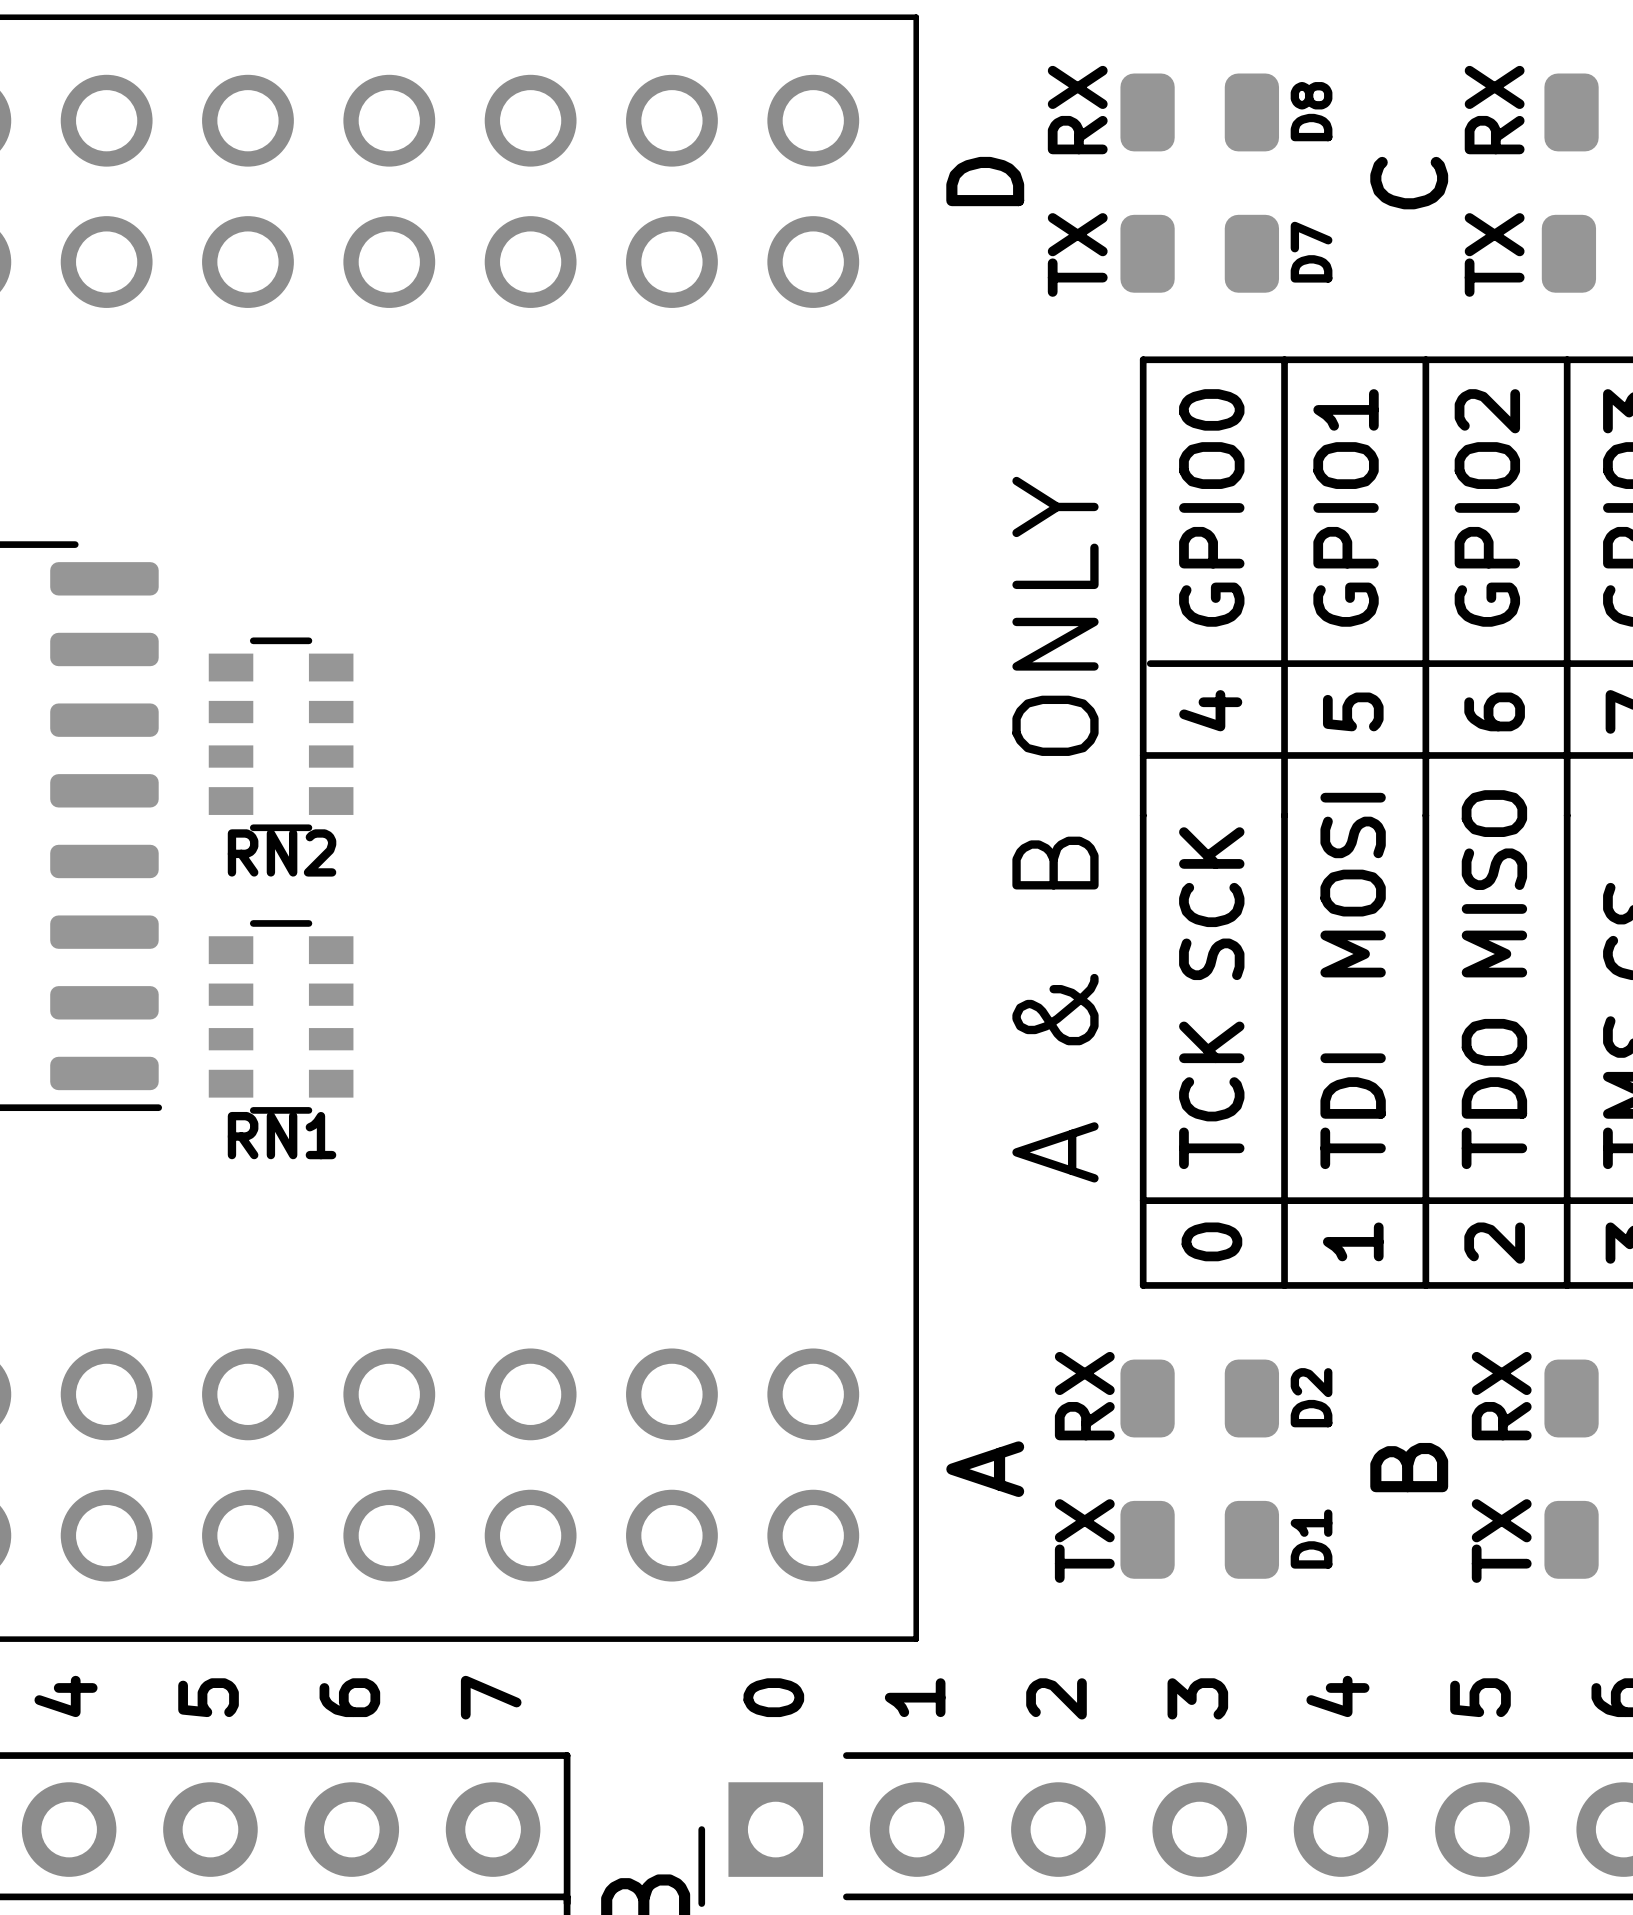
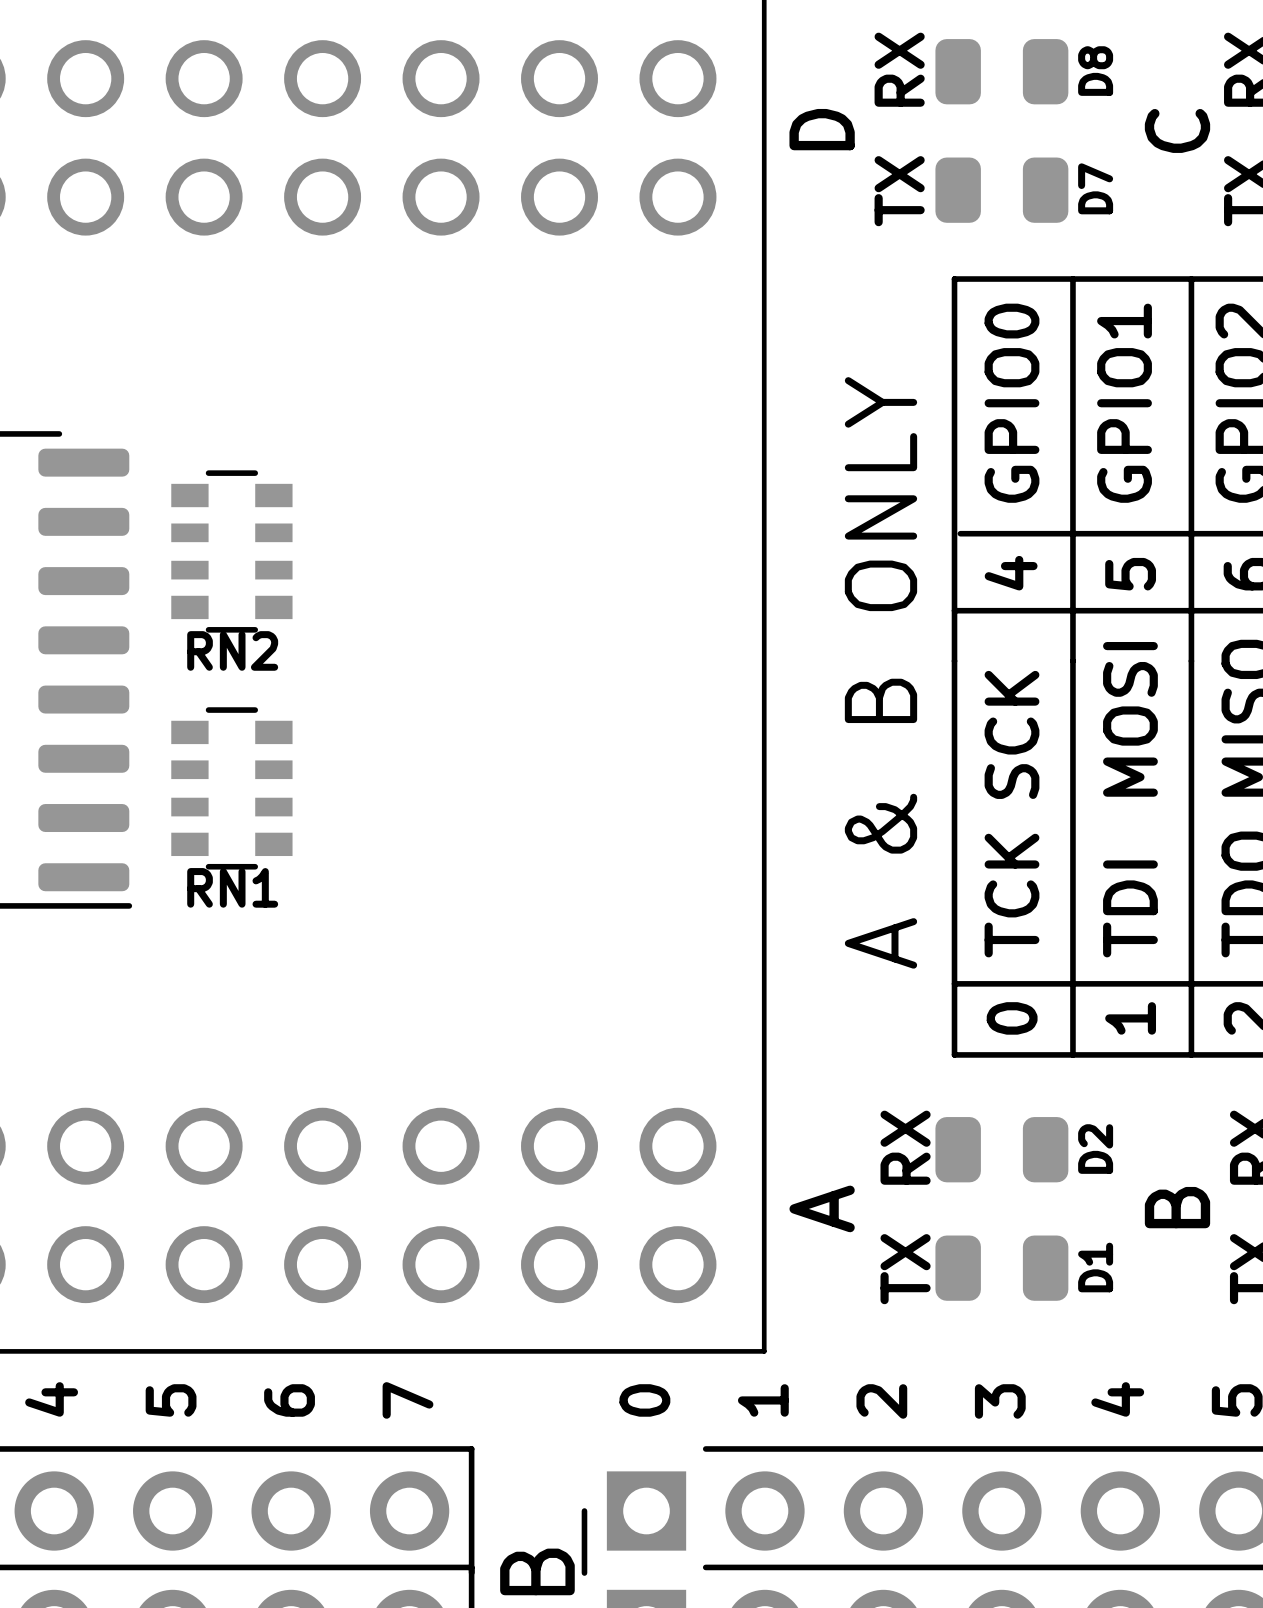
RN2 position: (281, 734) -> (231, 551)
RN1 position: (281, 1016) -> (231, 788)

